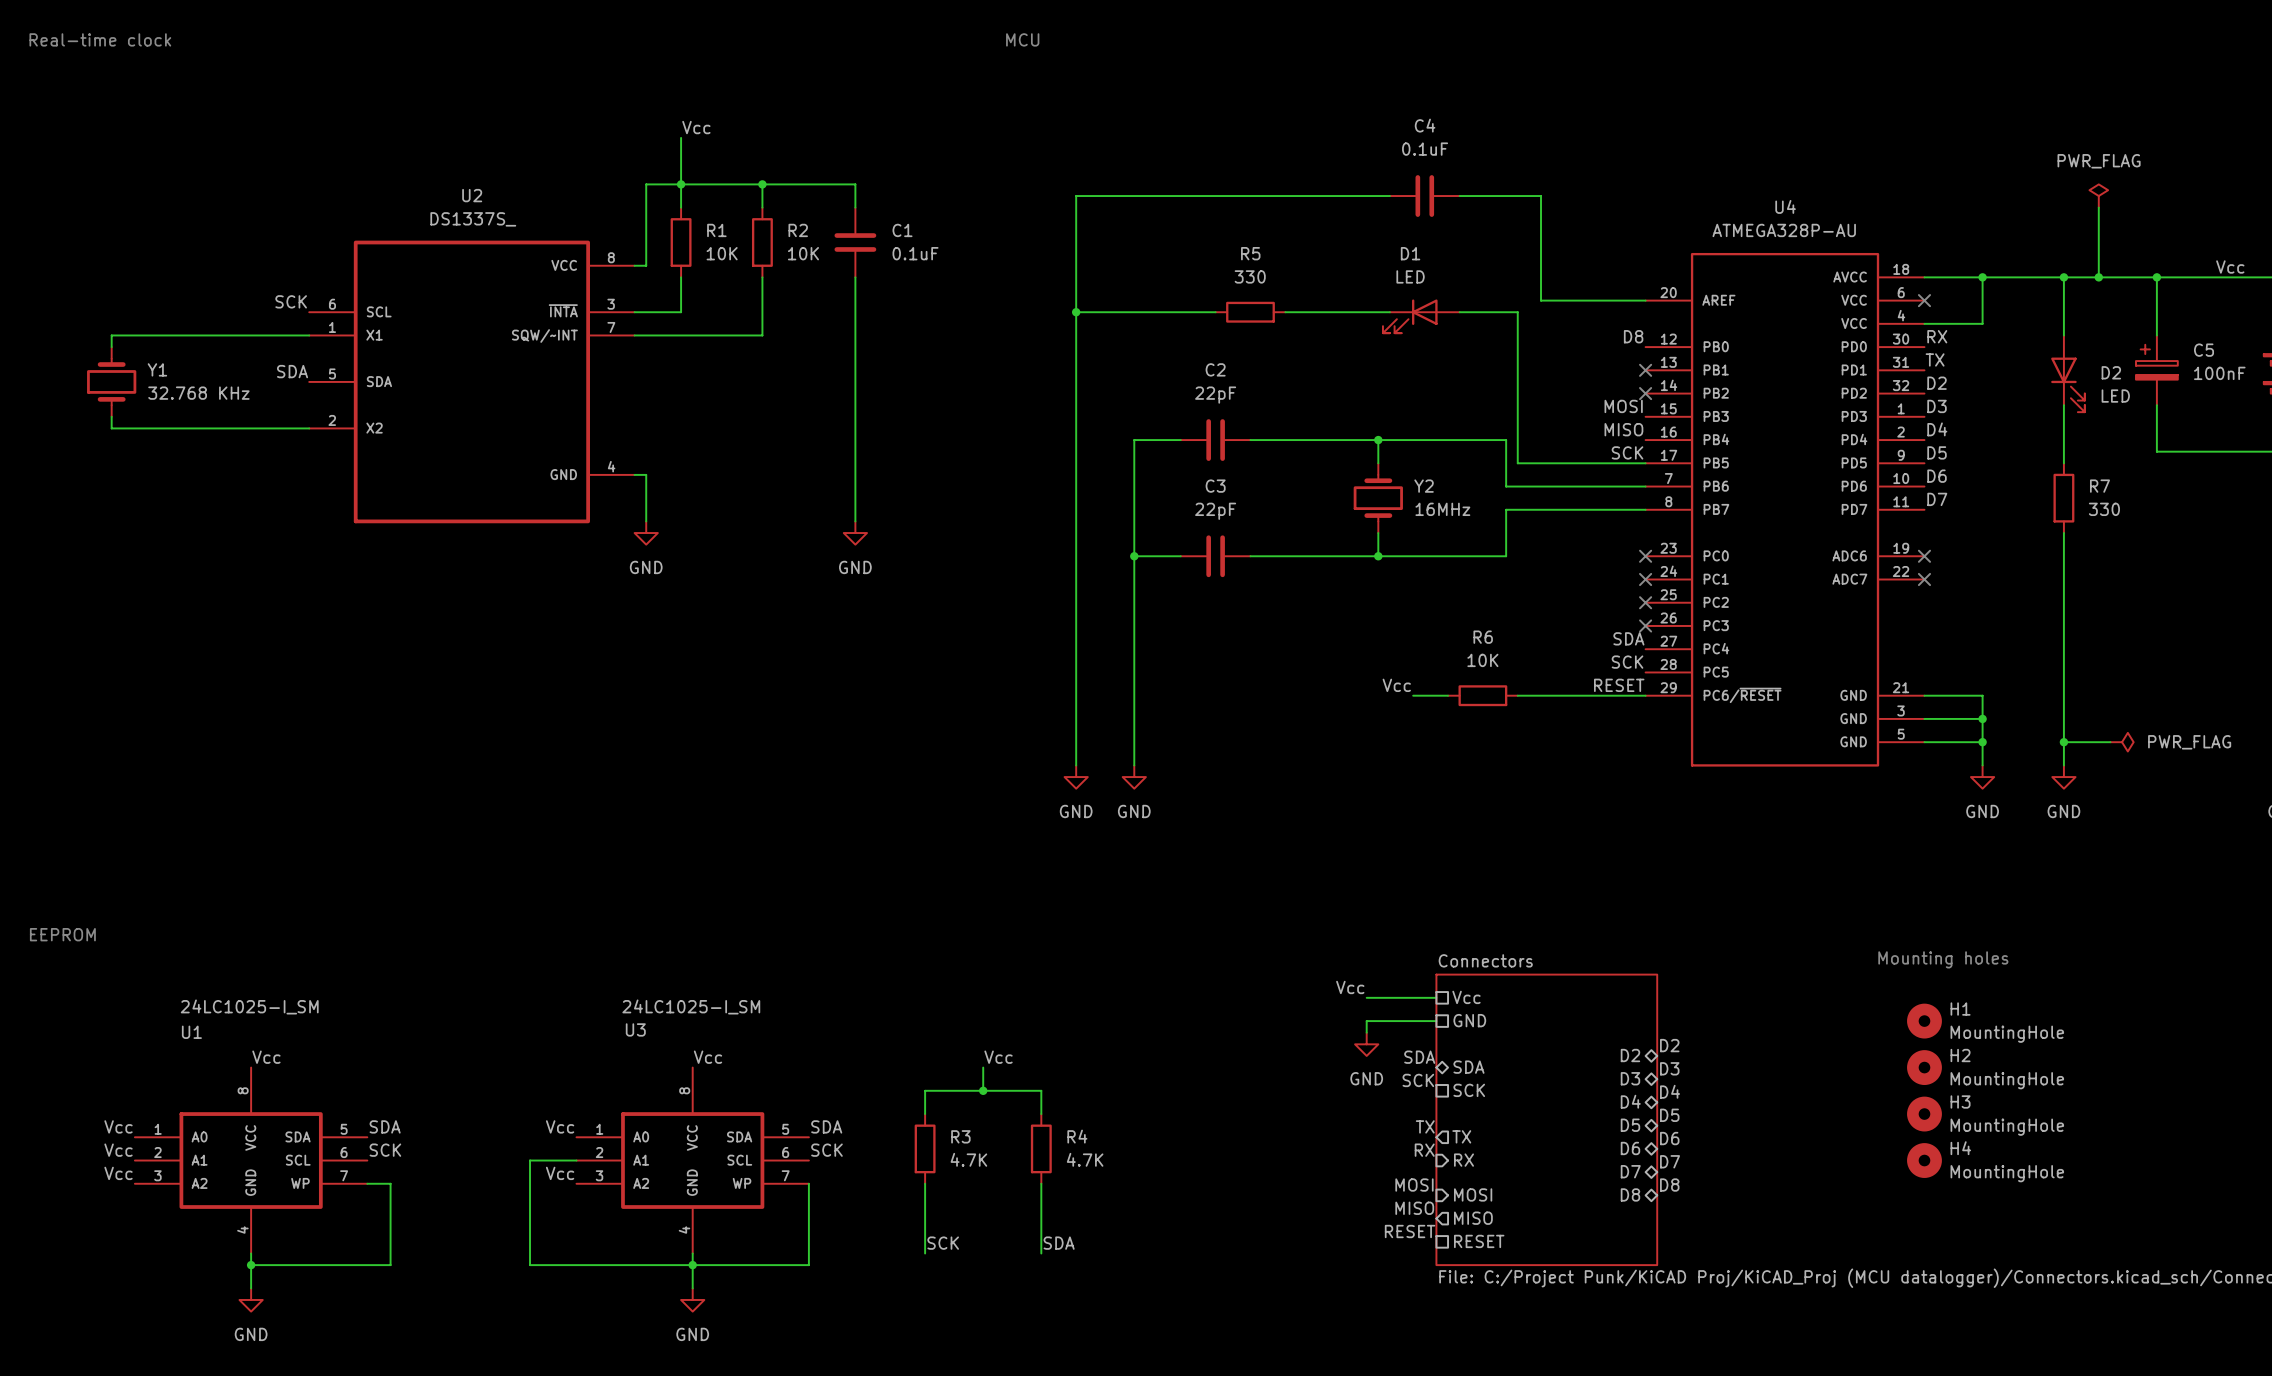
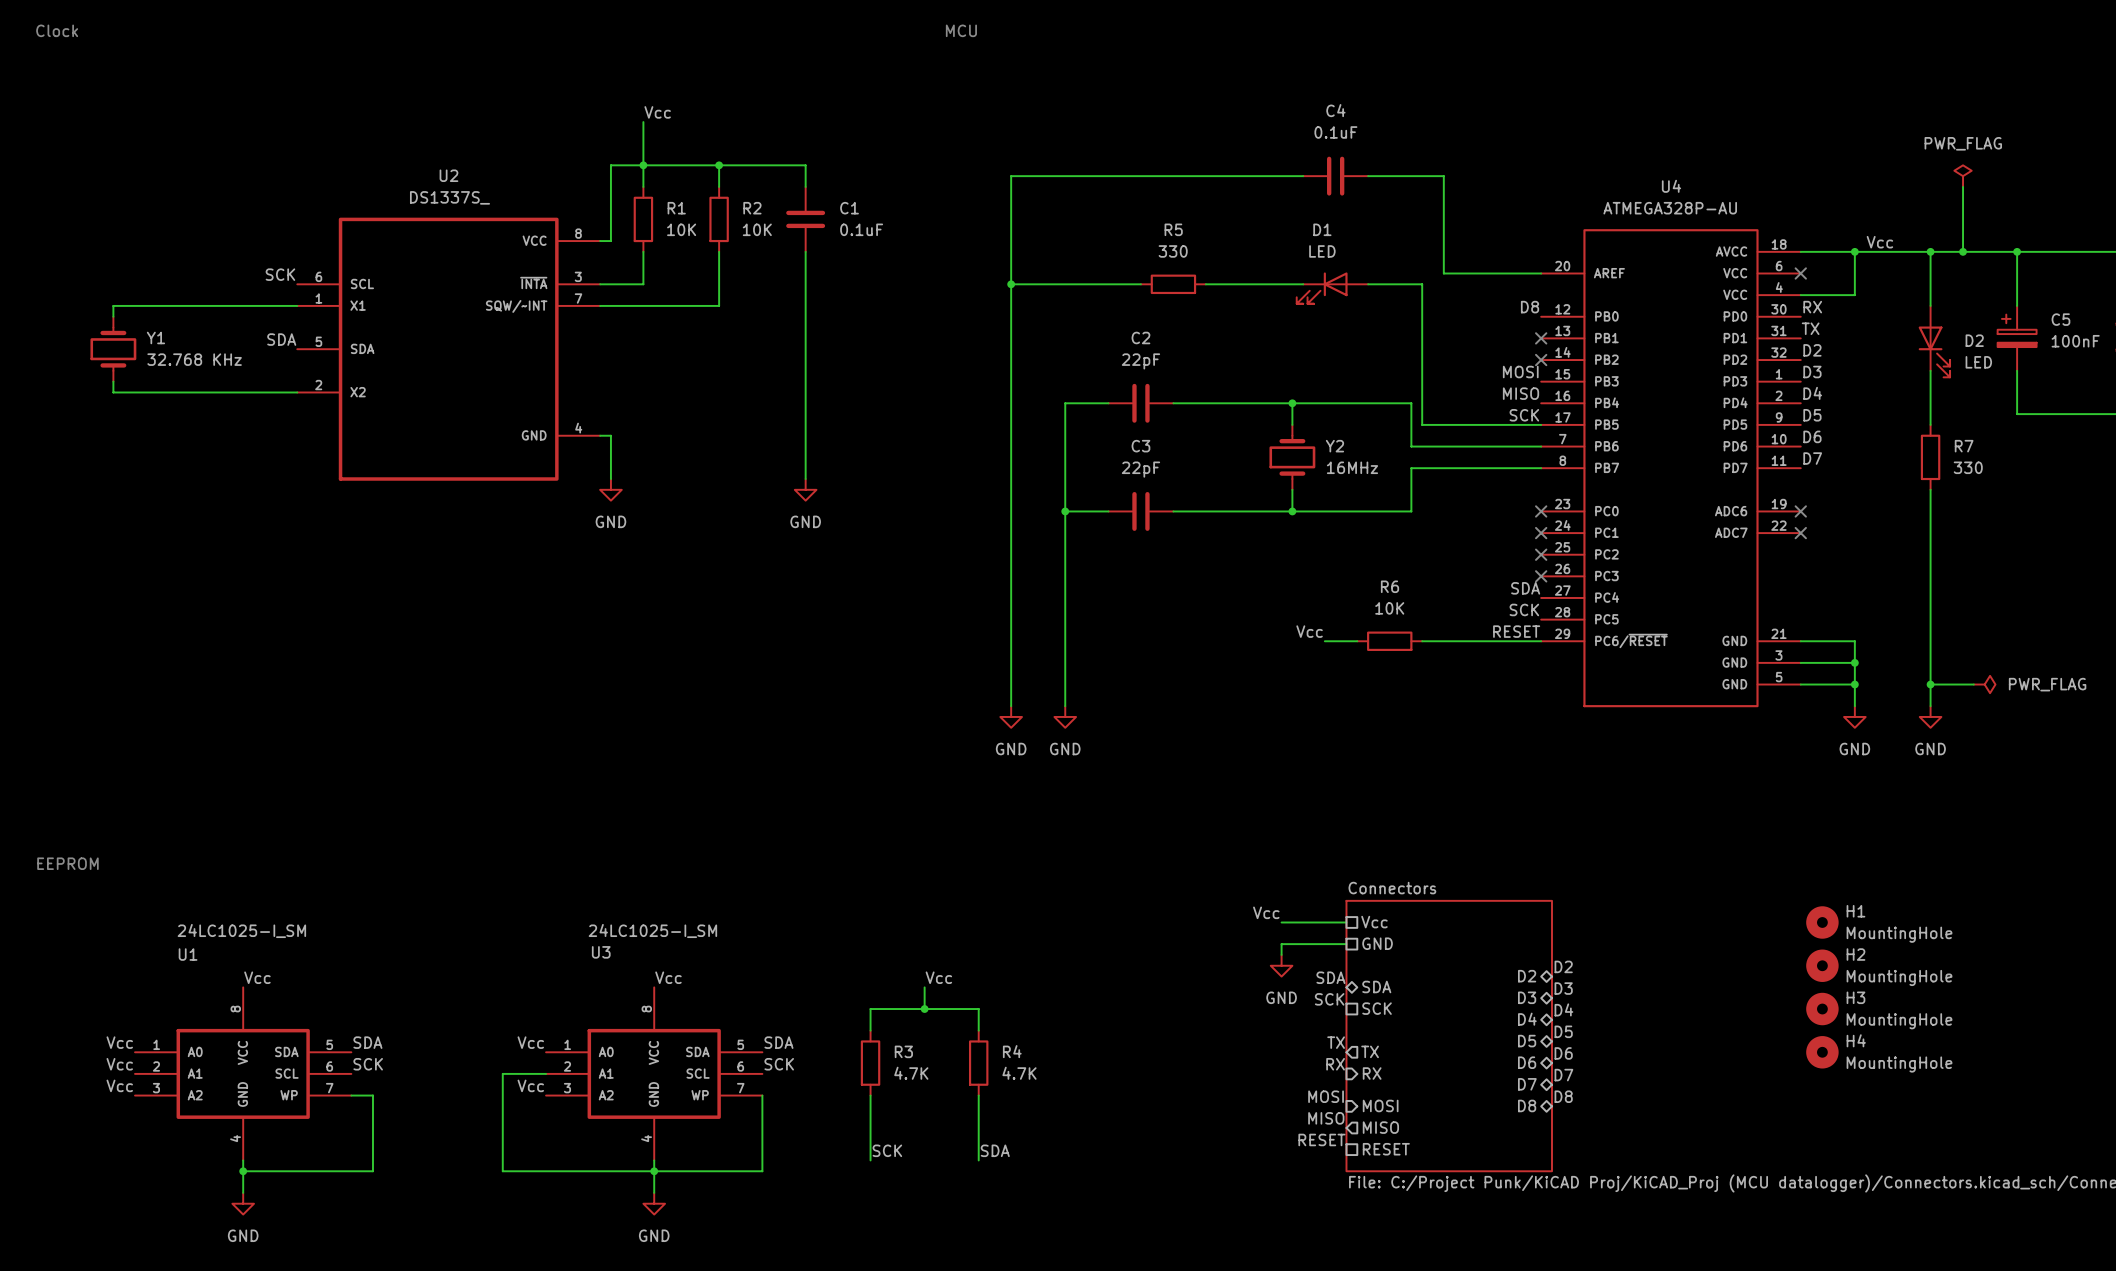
text: none -> Clock (57, 30)
text: Real-time clock (100, 39) -> none
label position: Vcc (2230, 266) -> Vcc (1879, 242)
text: Mounting holes (1943, 959) -> none
H1 position: (1924, 1021) -> (1822, 922)
H2 position: (1924, 1067) -> (1822, 965)
H3 position: (1924, 1114) -> (1822, 1009)
H4 position: (1924, 1160) -> (1822, 1052)

